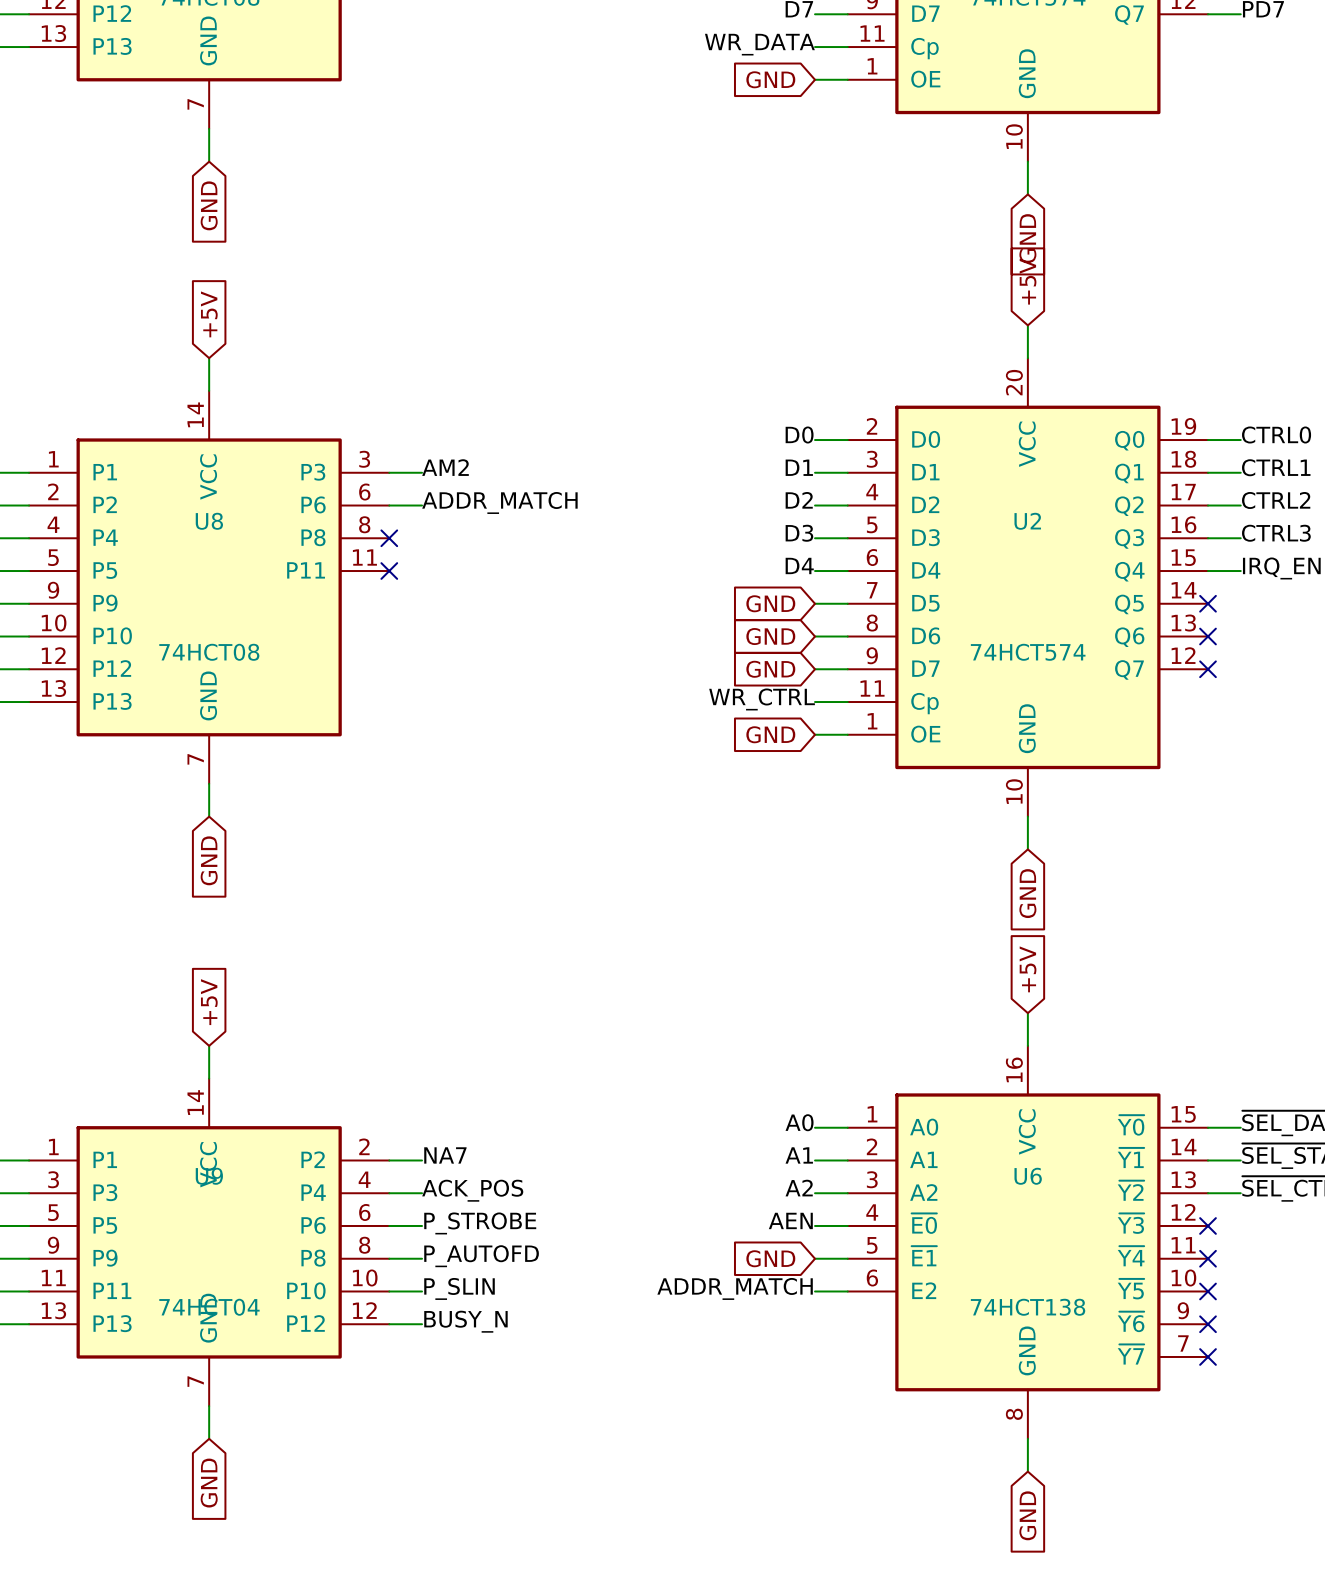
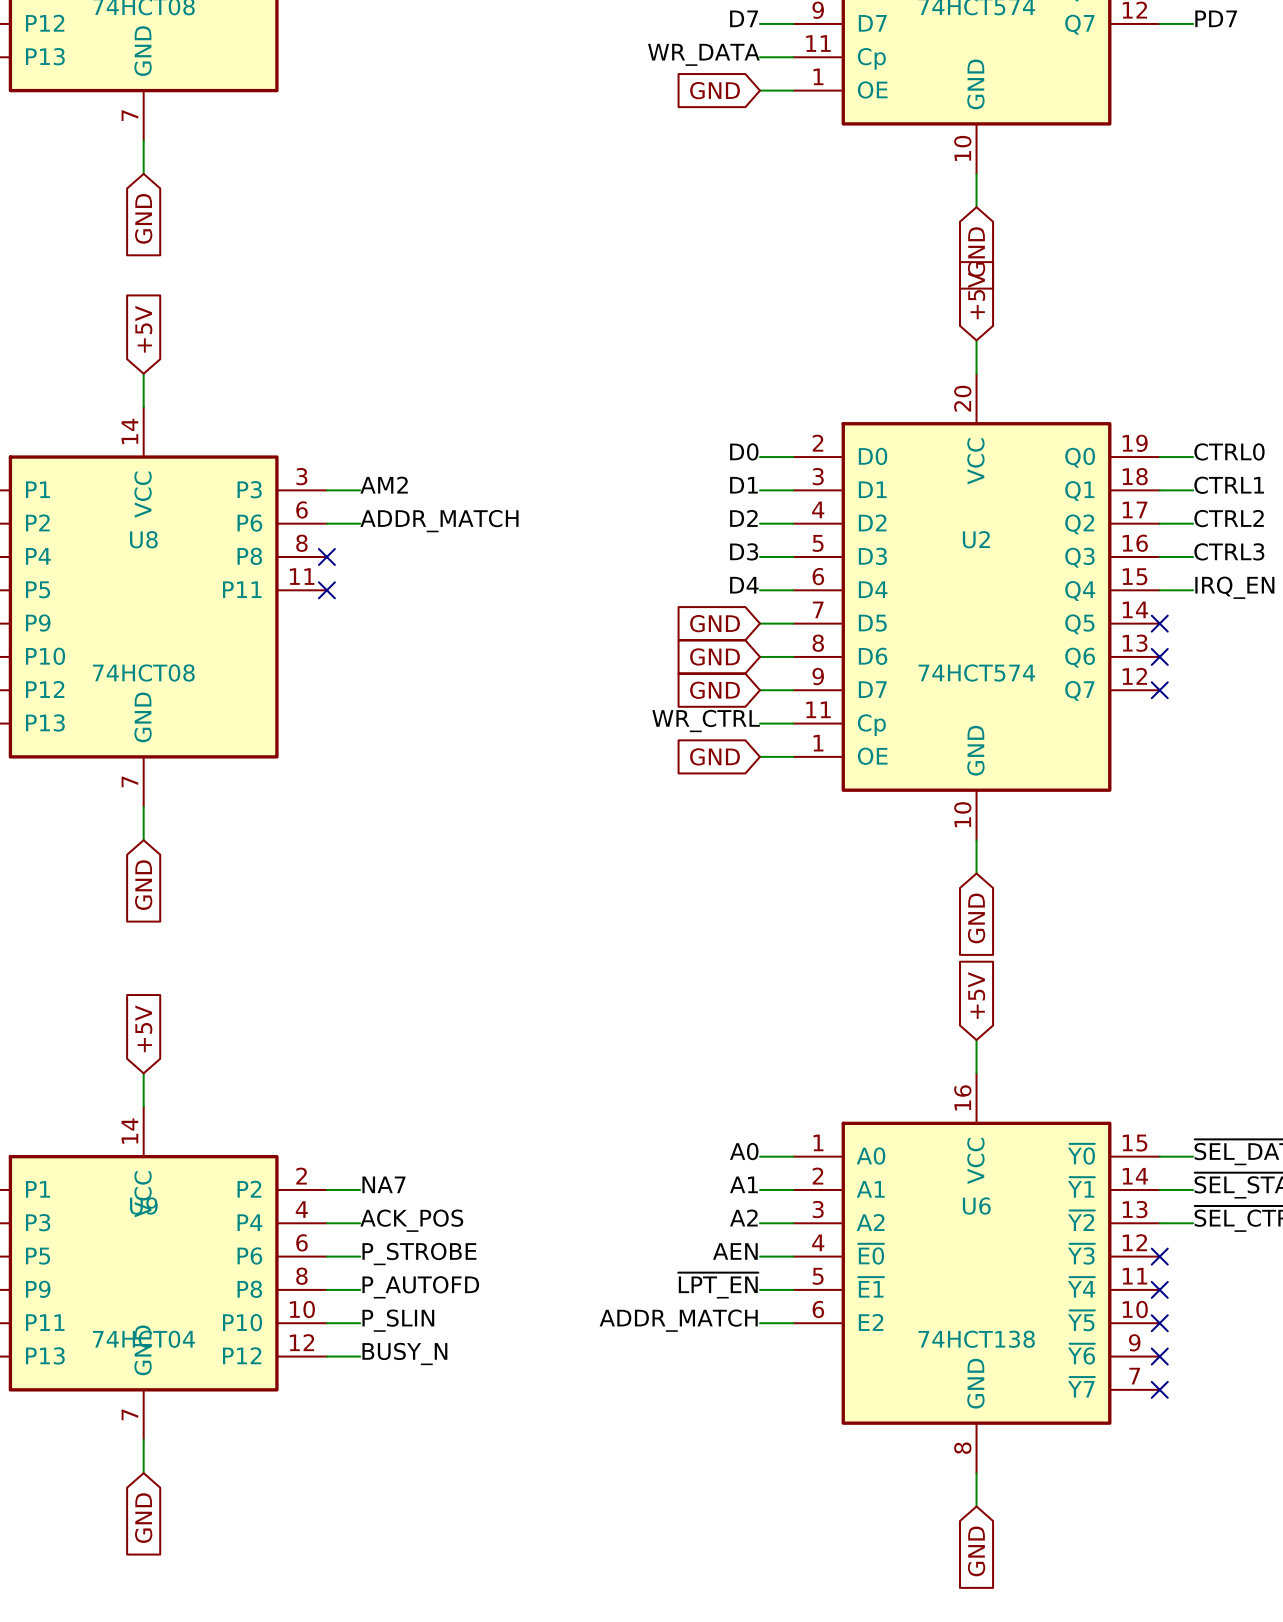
label: none -> ~{LPT_EN} (718, 1285)
global label: GND (770, 1258) -> none

